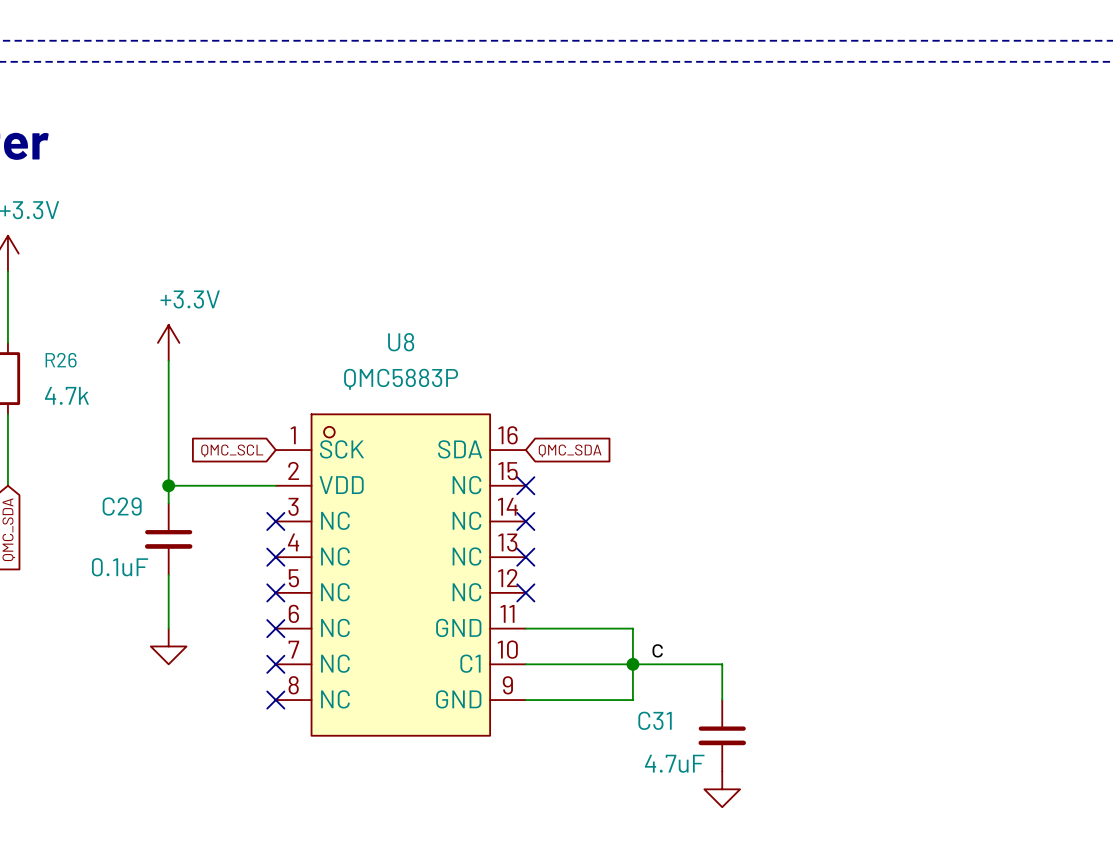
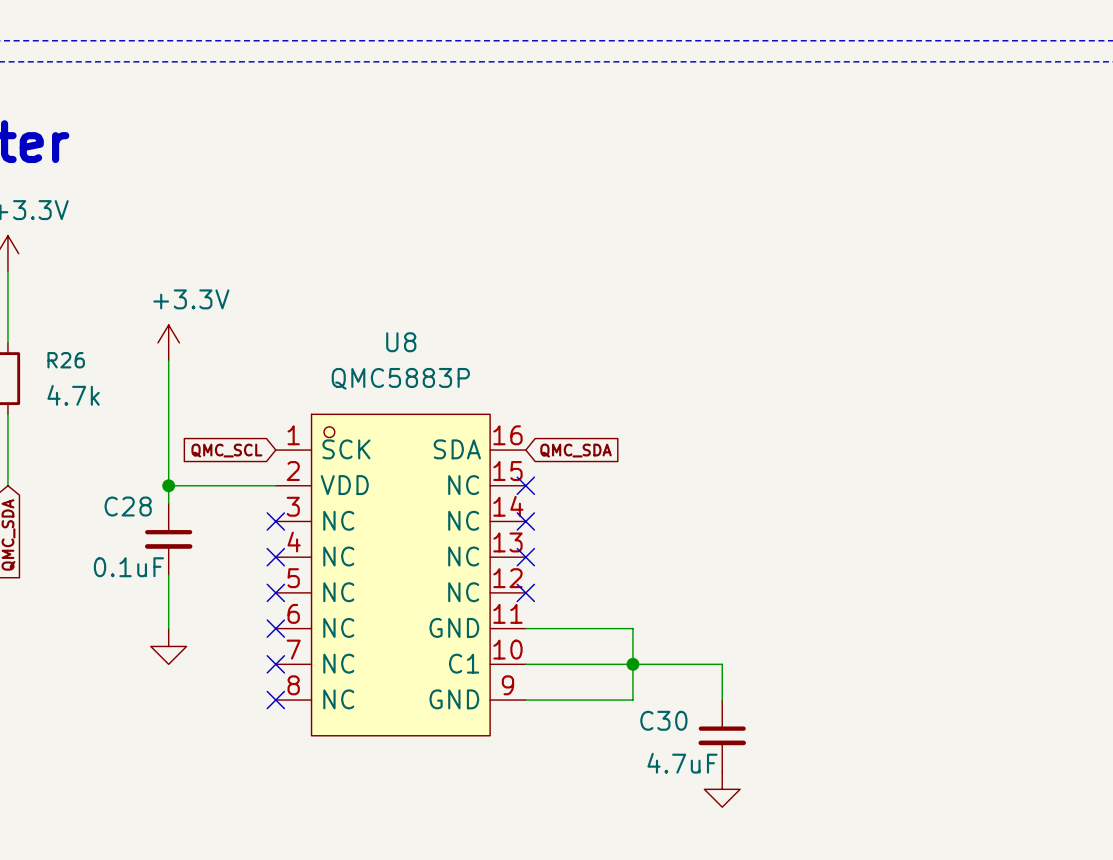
C29 name: C29 (122, 506) -> C28 (128, 506)
label: c (657, 650) -> none
C31 name: C31 (655, 720) -> C30 (663, 720)

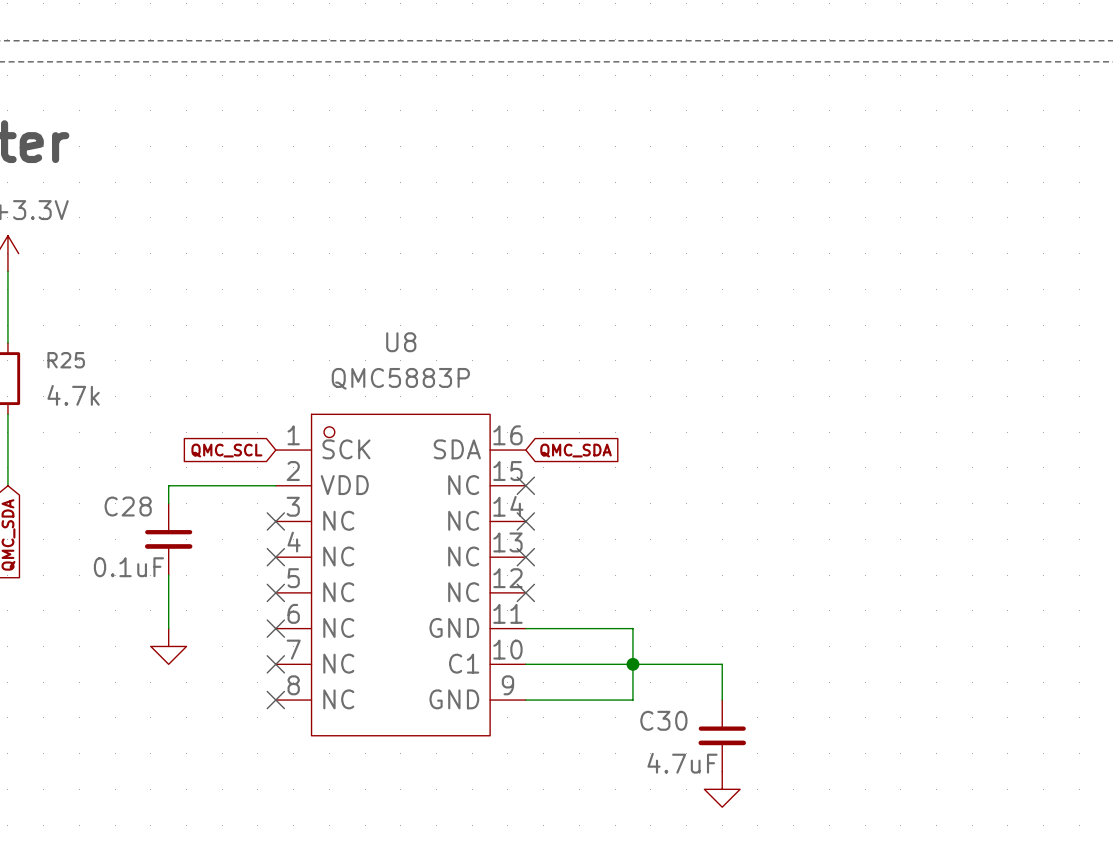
power symbol: +3.3V (168, 342) -> none
R26 name: R26 (66, 360) -> R25 (66, 360)
wire: (168, 360) (168, 485) -> none
junction: (168, 485) -> none

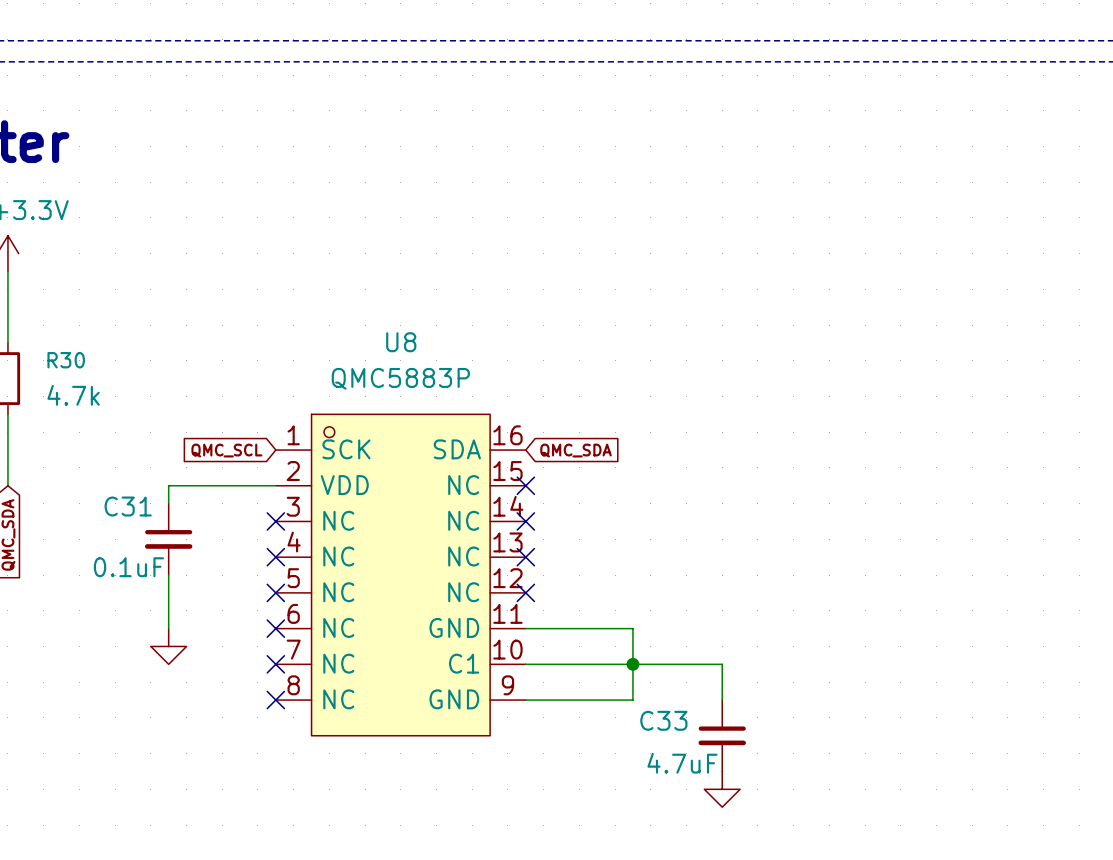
R25 name: R25 (66, 360) -> R30 (66, 360)
C28 name: C28 (128, 506) -> C31 (128, 506)
C30 name: C30 (663, 720) -> C33 (663, 720)

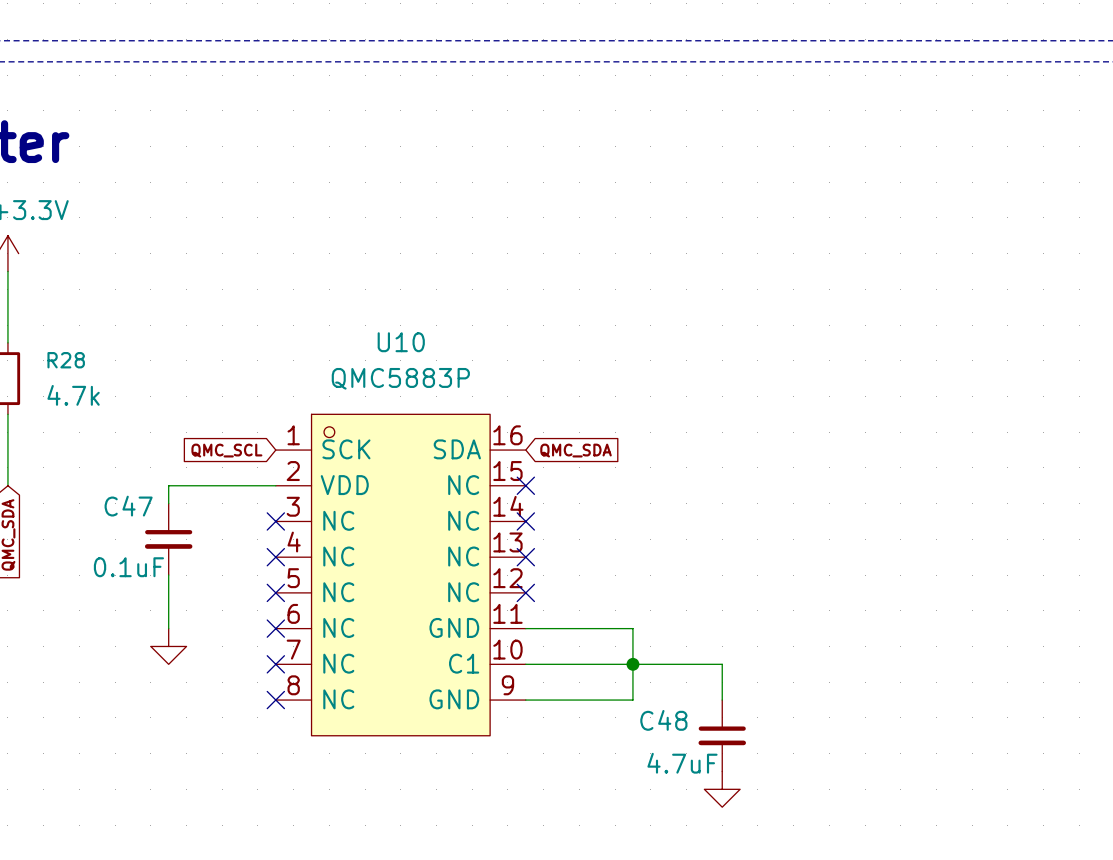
U8 name: U8 (401, 342) -> U10 (401, 342)
R30 name: R30 (66, 360) -> R28 (66, 360)
C31 name: C31 (128, 506) -> C47 (128, 506)
C33 name: C33 (663, 720) -> C48 (663, 720)

